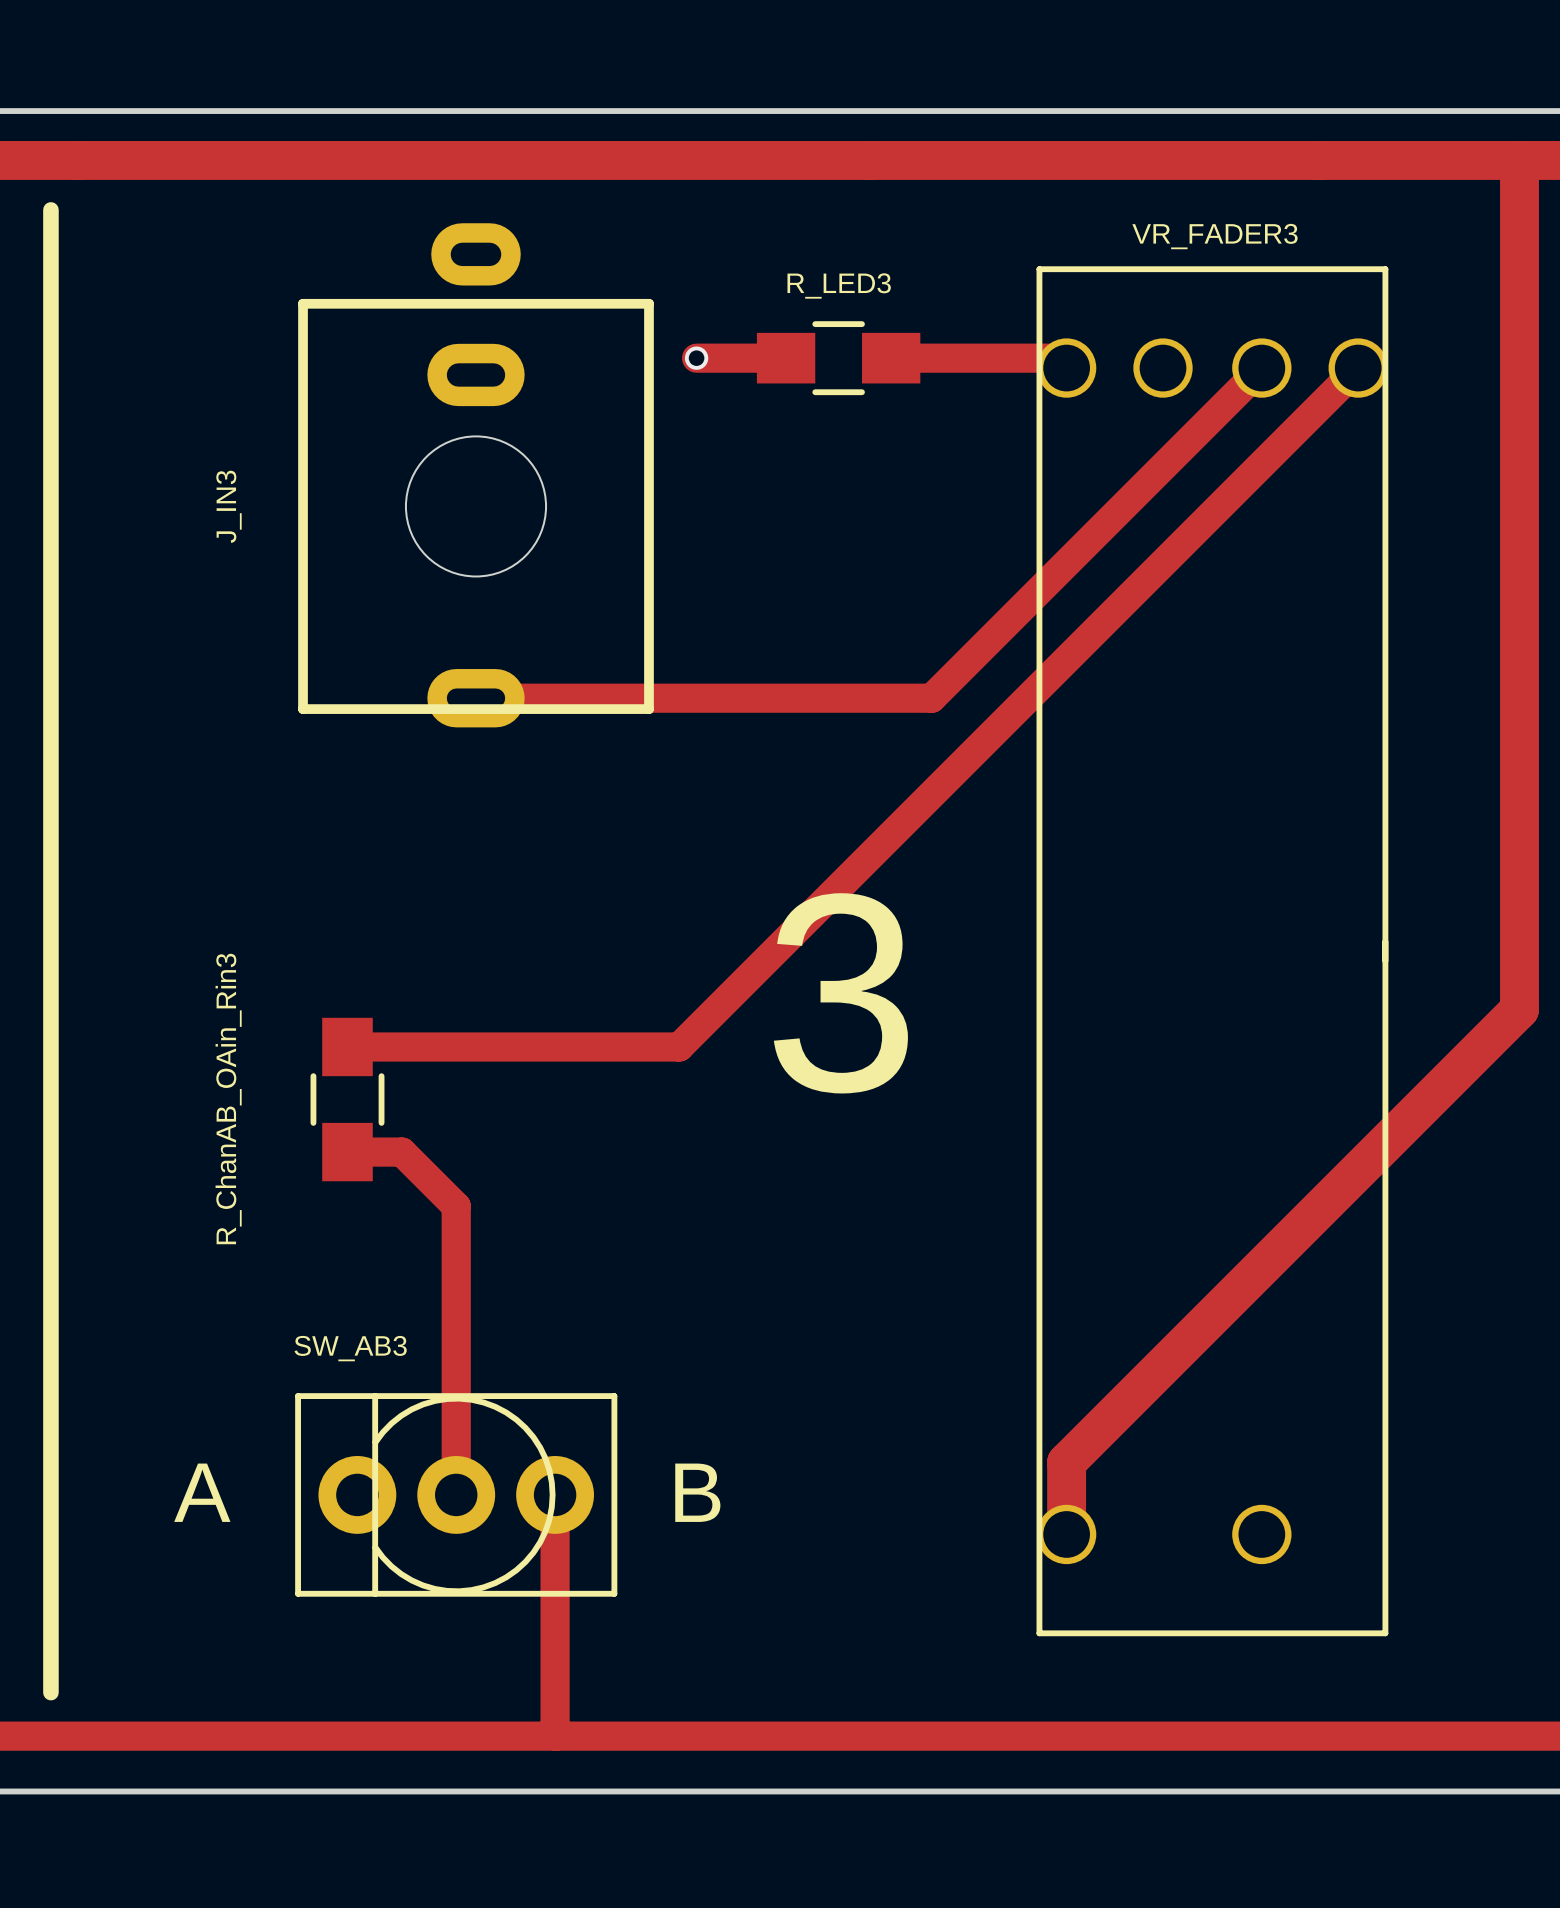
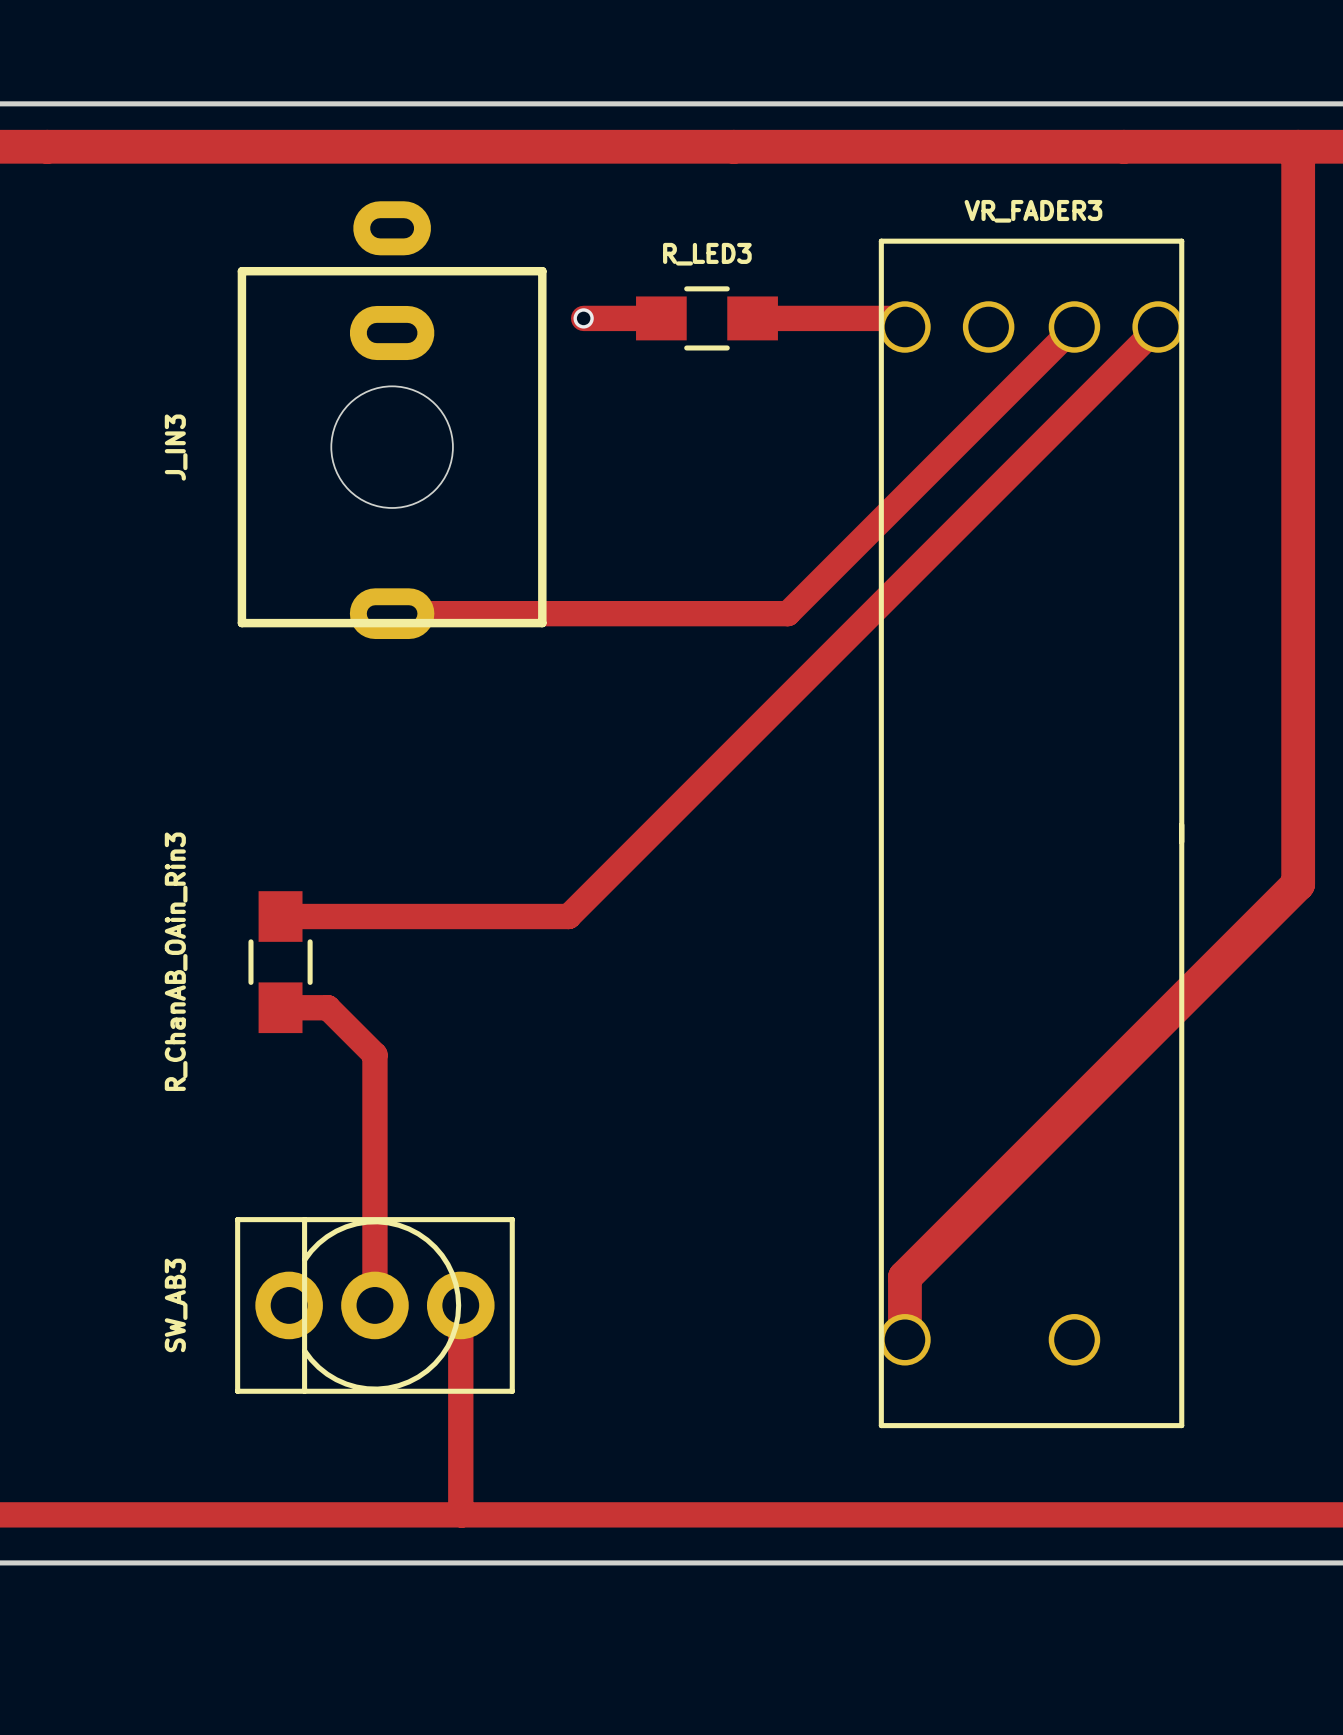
line: (50, 209) (50, 1692) -> none
text: 3 (840, 993) -> none
SW_AB3 name rotation: 0° (350, 1348) -> 90° counterclockwise (176, 1305)
SW_AB3 name position: SW_AB3 (350, 1348) -> SW_AB3 (176, 1305)
text: A (202, 1492) -> none
text: B (697, 1492) -> none

